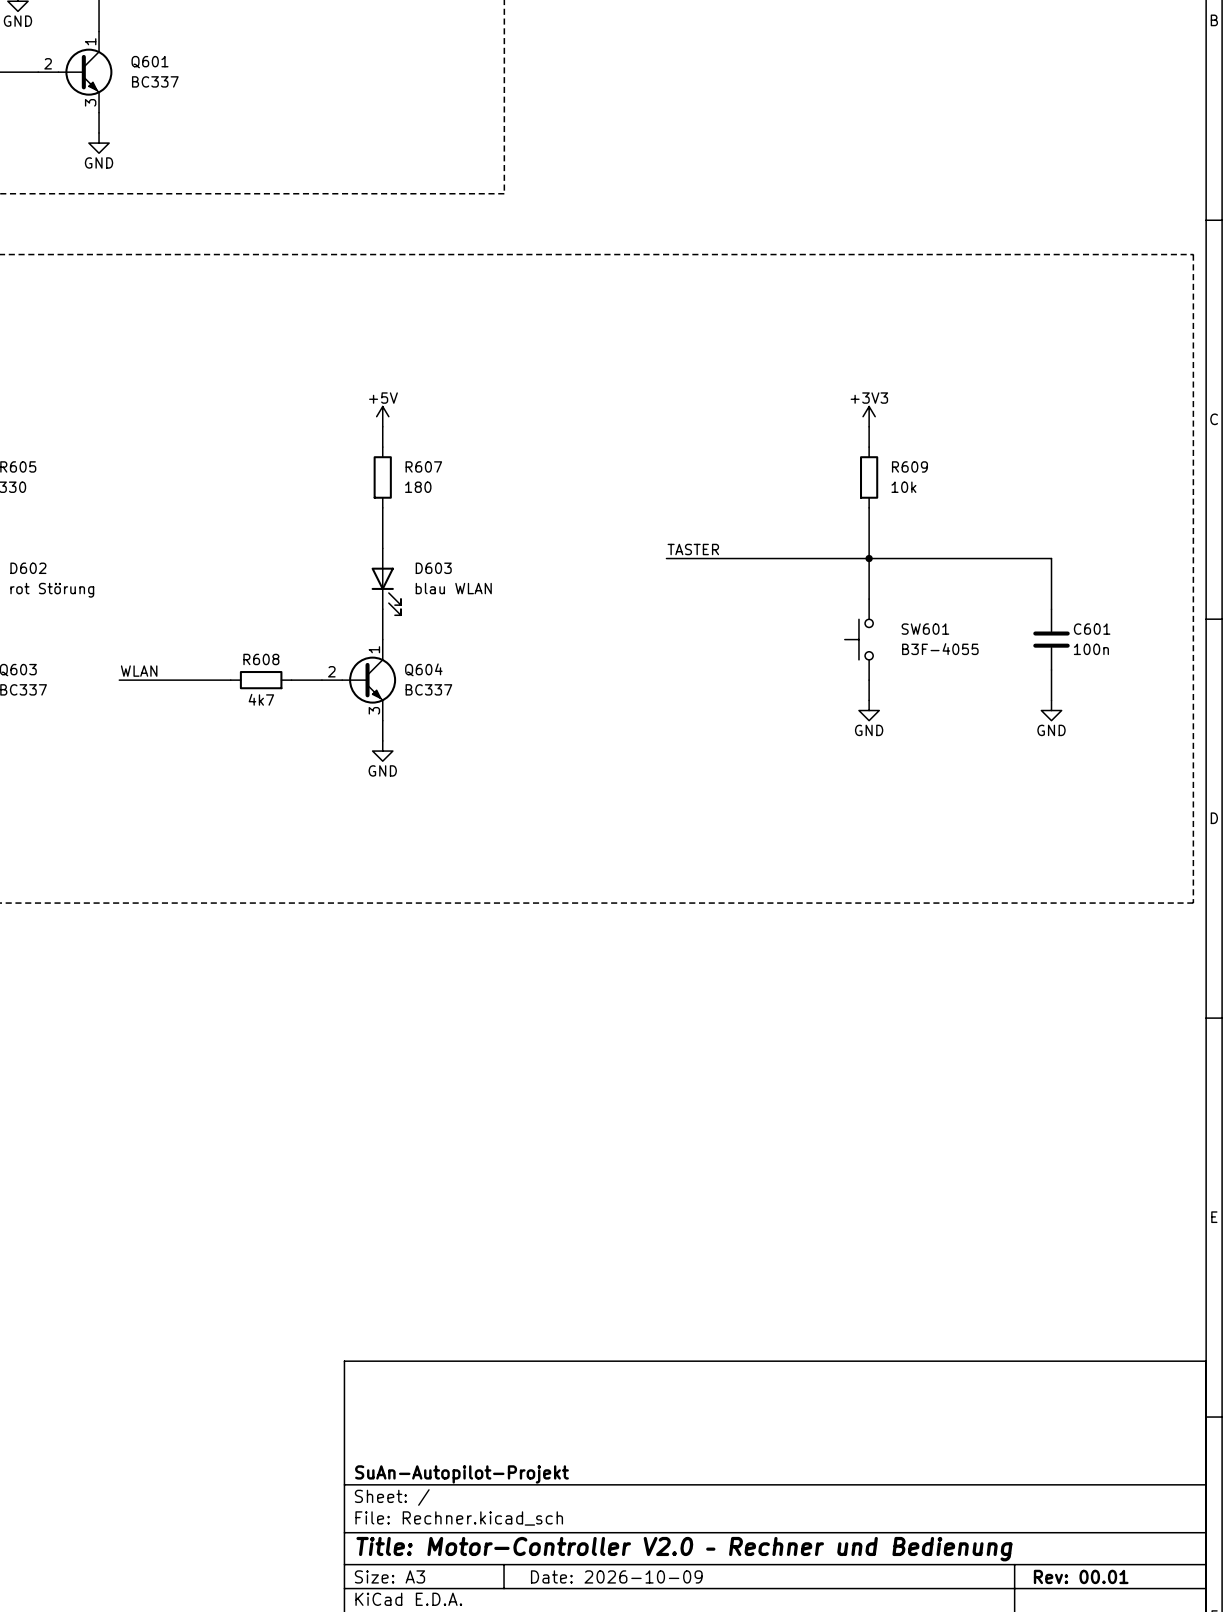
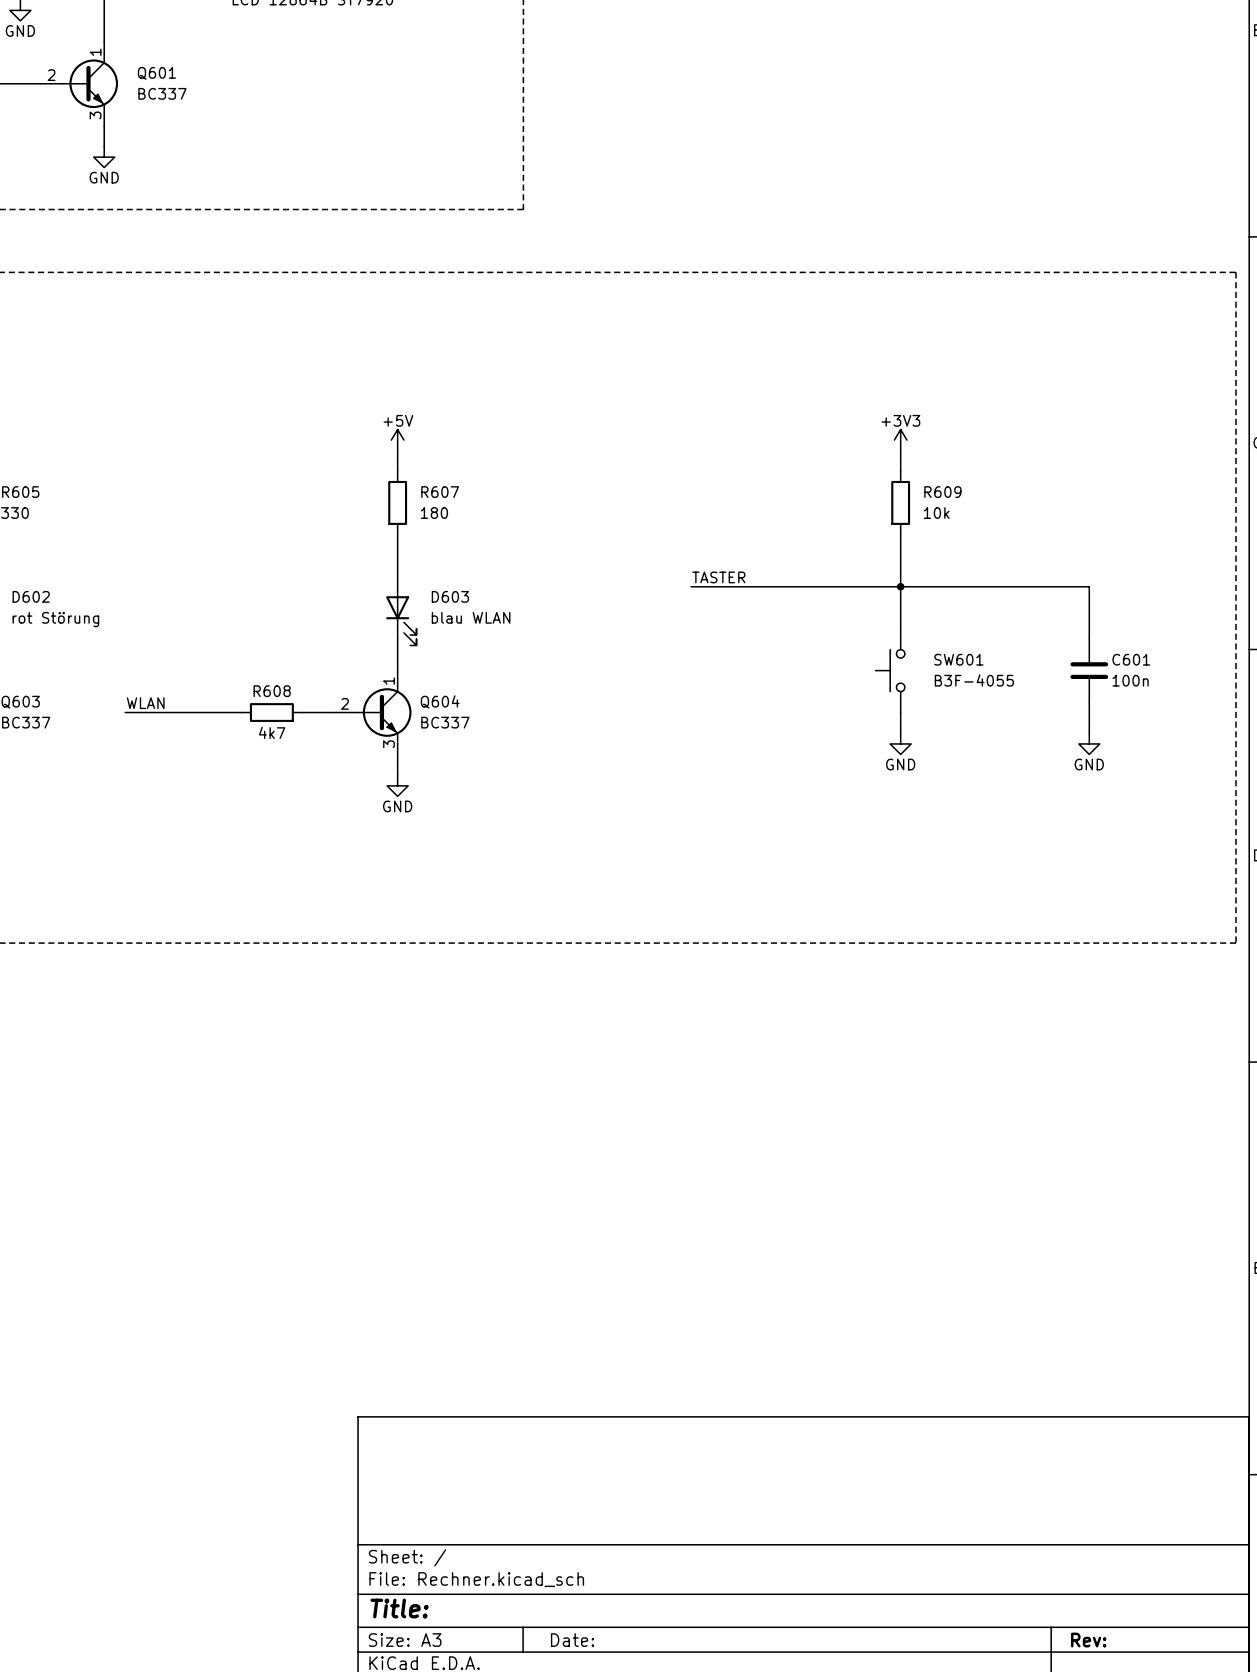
title block: SuAn-Autopilot-Projekt (461, 1474) -> none
title block: Title: Motor-Controller V2.0 – Rechner und Bedienung (684, 1549) -> Title: (399, 1608)
title block: Date: 2026-10-09 (616, 1576) -> Date: (572, 1640)
title block: Rev: 00.01 (1081, 1576) -> Rev: (1088, 1640)

